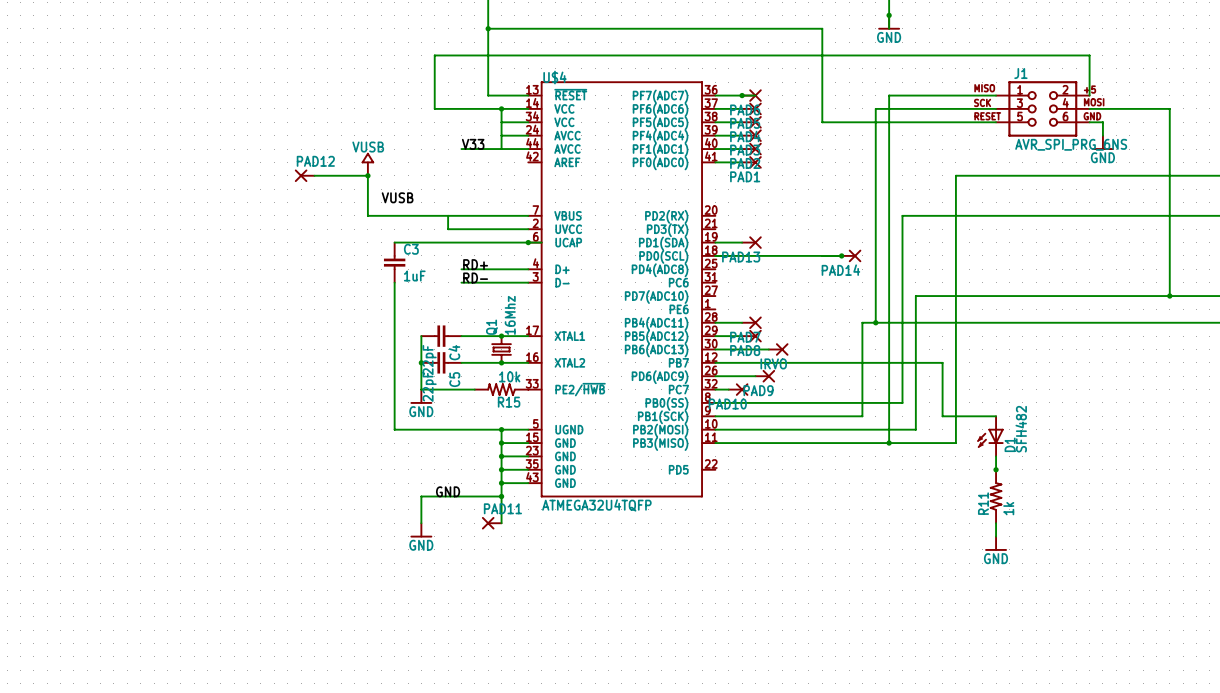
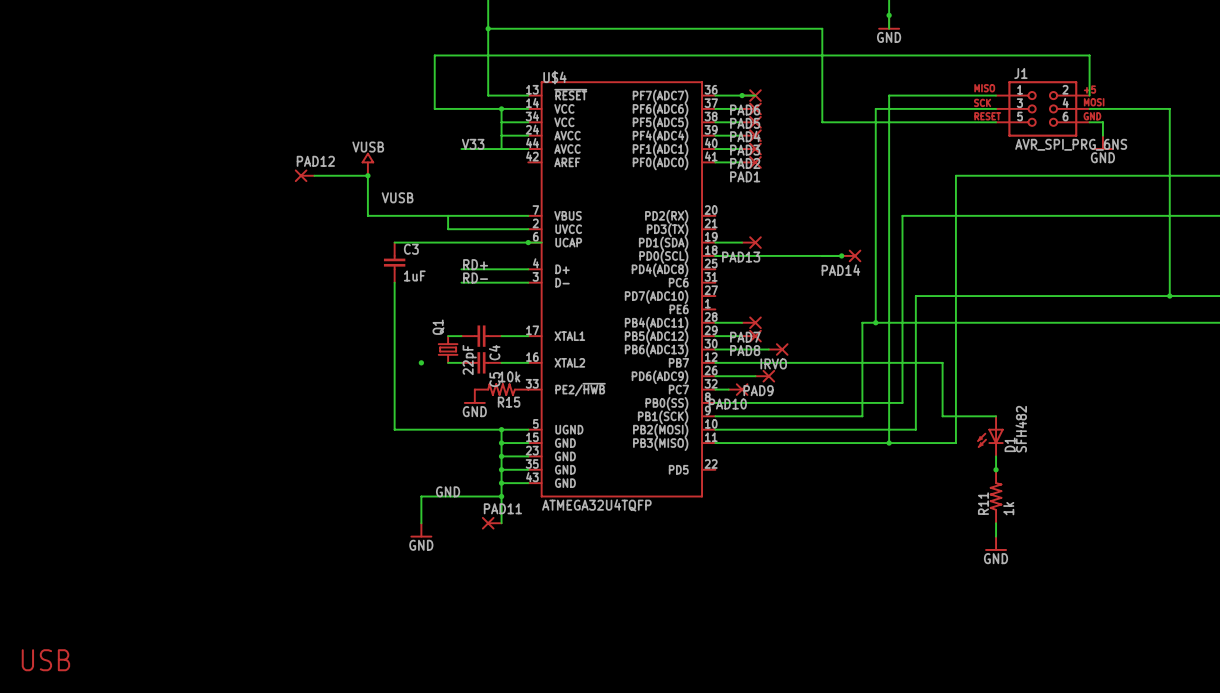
Q1 value: 16Mhz (510, 315) -> none
wire: (421, 336) (421, 389) (474, 389) -> none
C4 position: (441, 336) -> (481, 336)
junction: (501, 336) -> none
Q1 position: (501, 349) -> (448, 349)
C5 position: (441, 362) -> (481, 362)
junction: (501, 362) -> none
C5 value: 22pF (429, 386) -> none
power symbol position: GND (421, 396) -> GND (474, 396)
text: none -> USB (45, 660)

